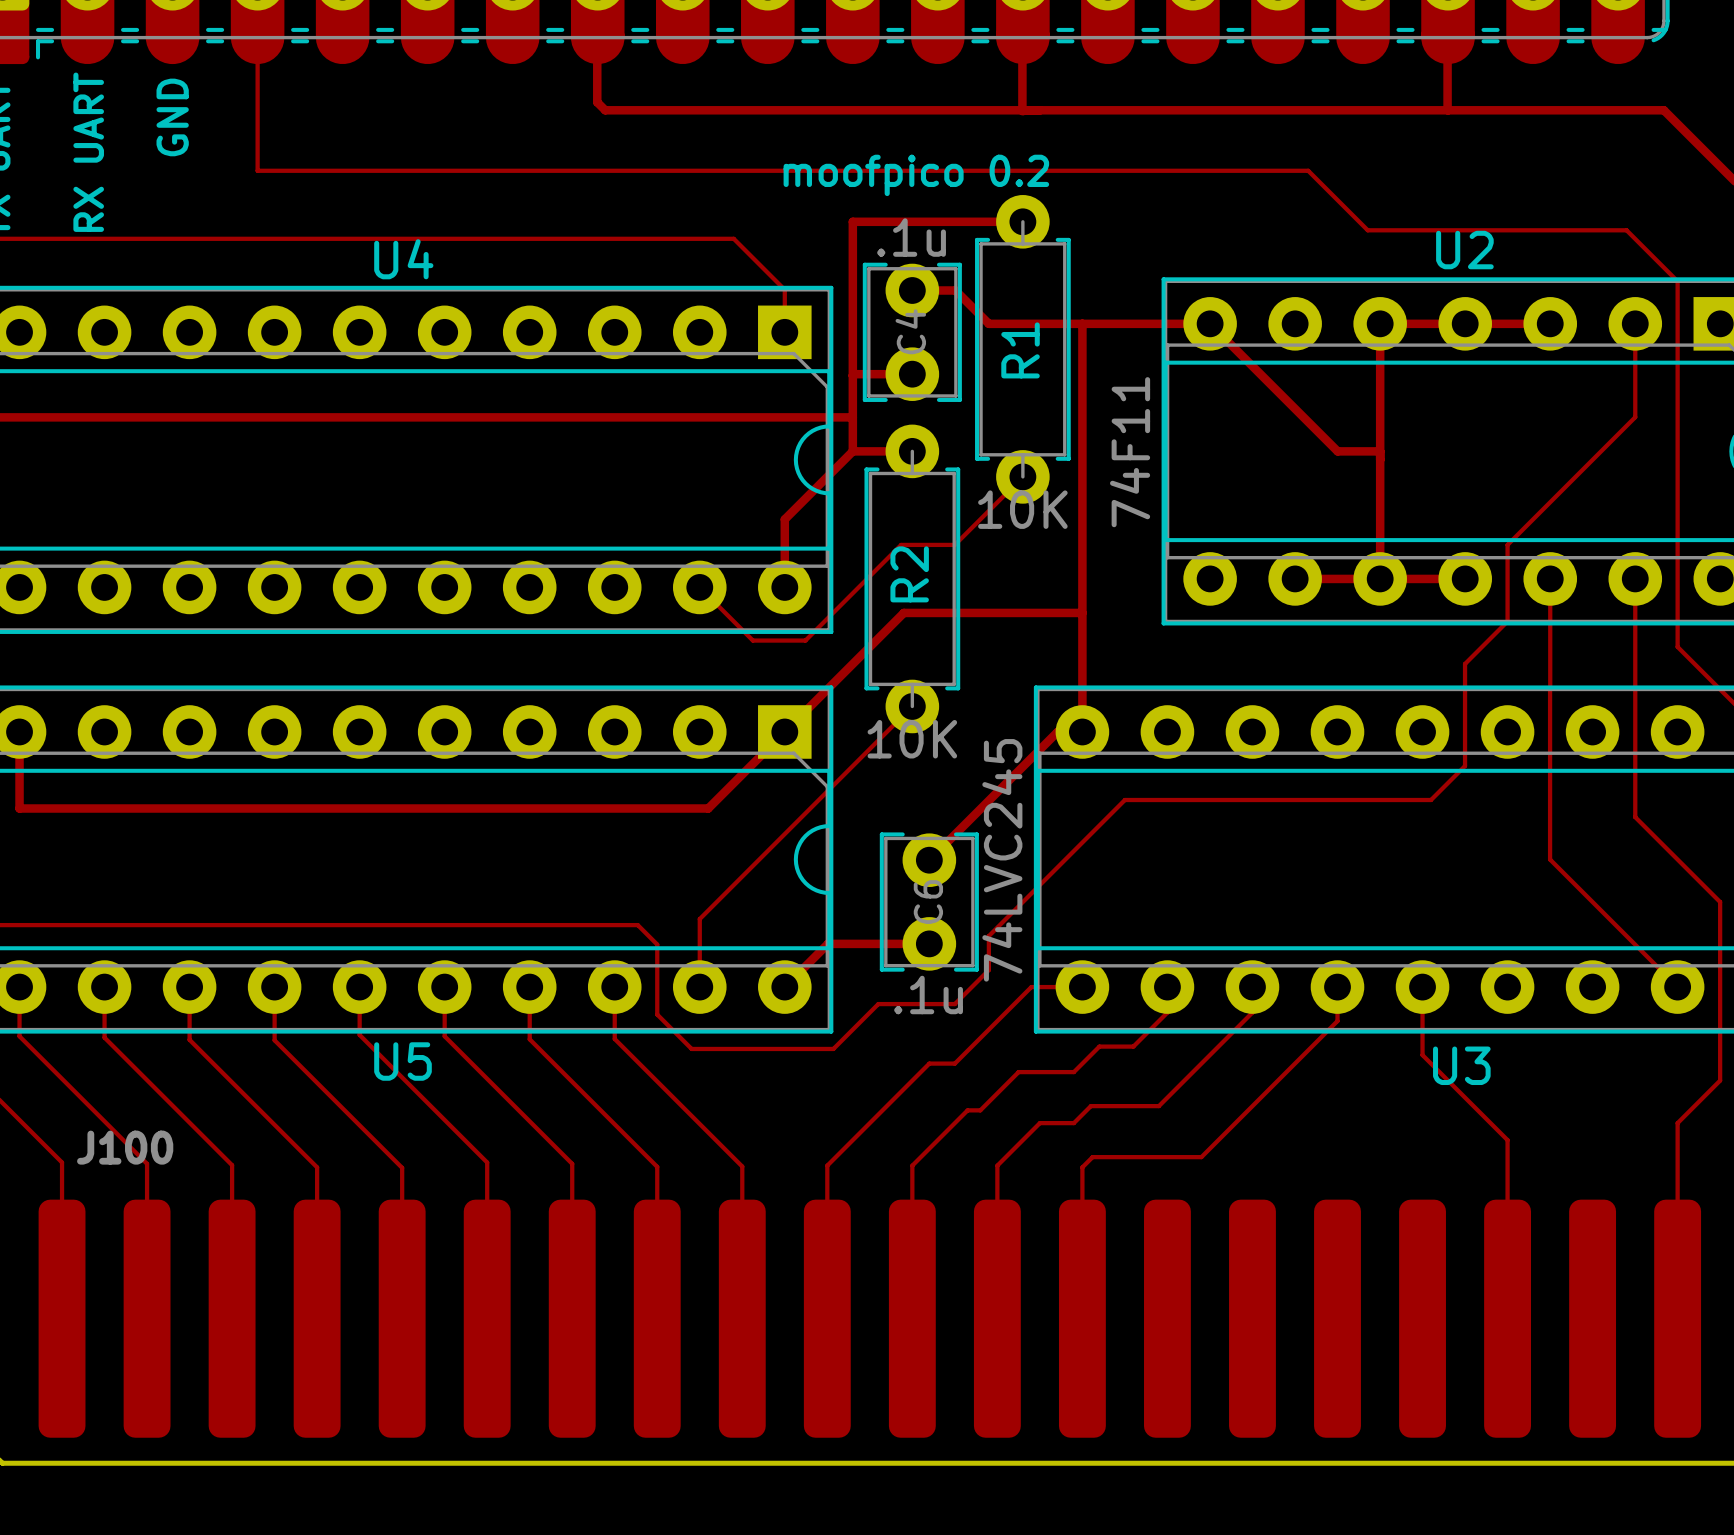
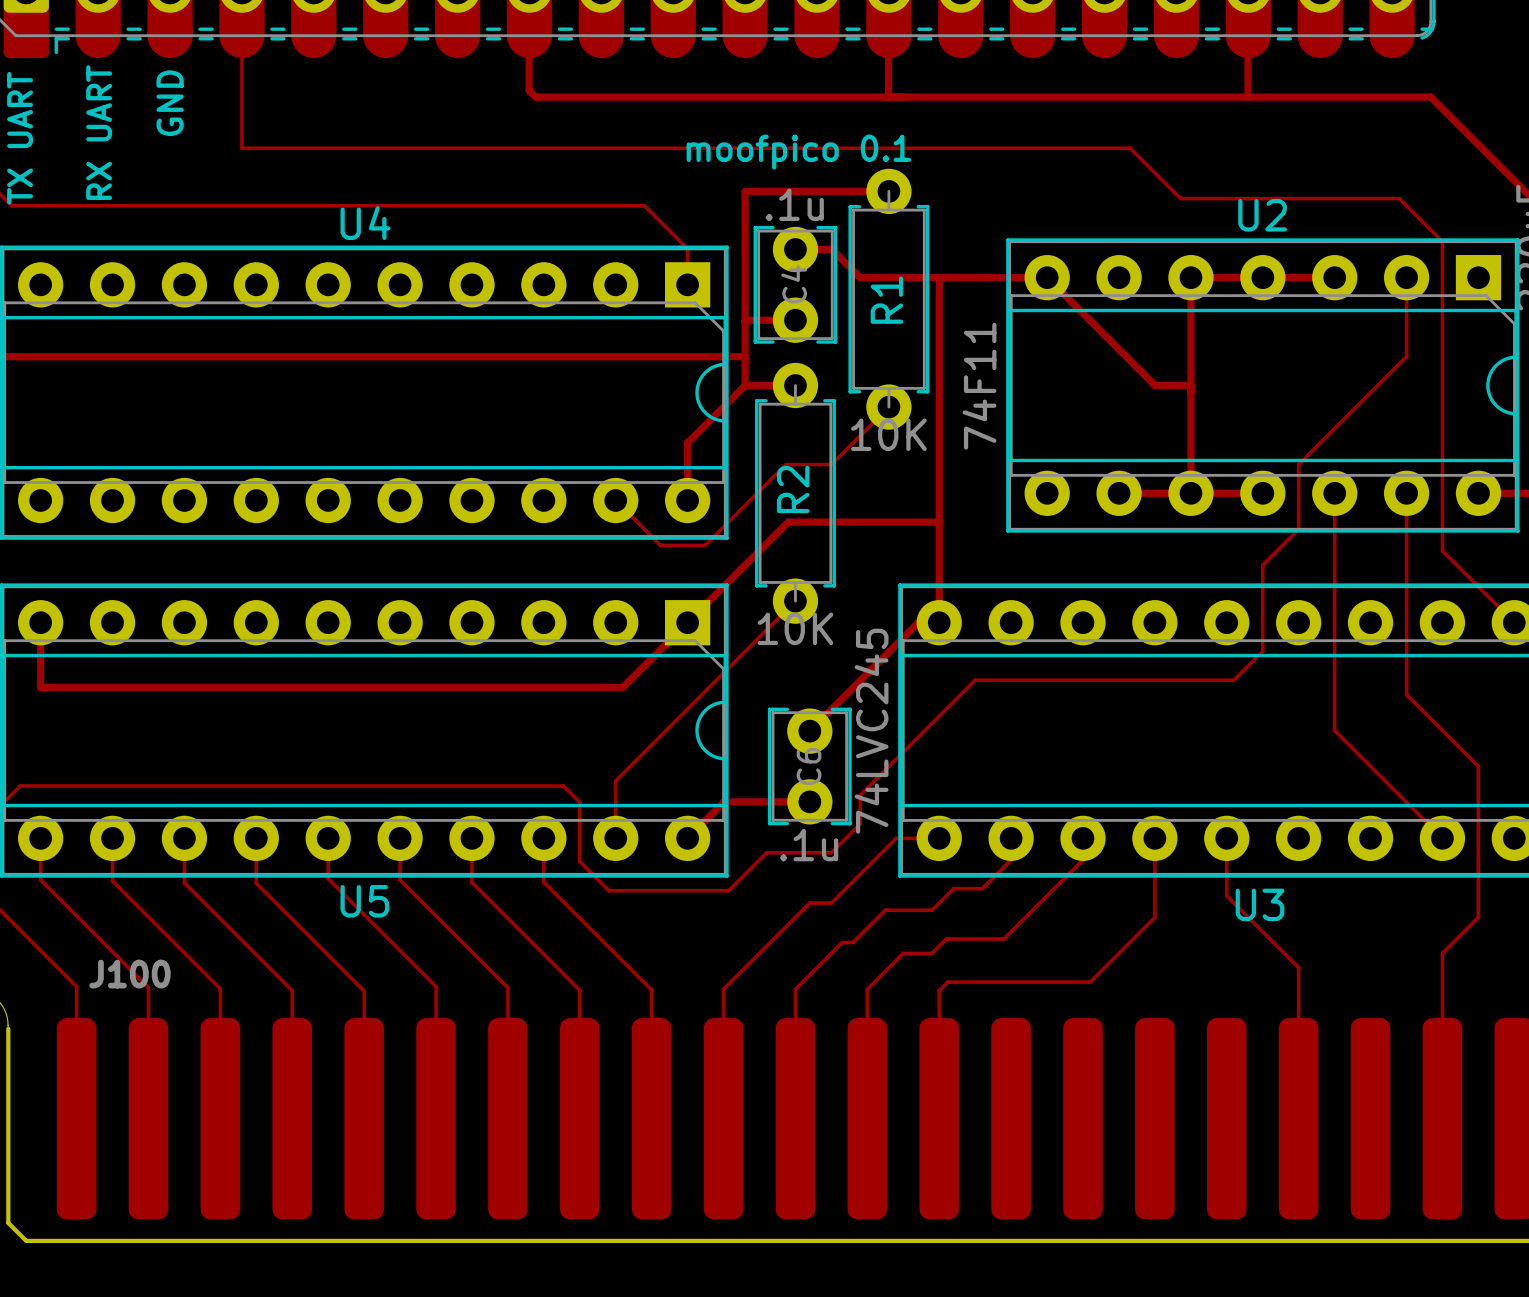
text: moofpico 0.2 (916, 175) -> moofpico 0.1 (798, 152)
track: (1337, 1021) (1201, 1157) -> (1154, 867) (1154, 917) (1090, 982) (1039, 982)

